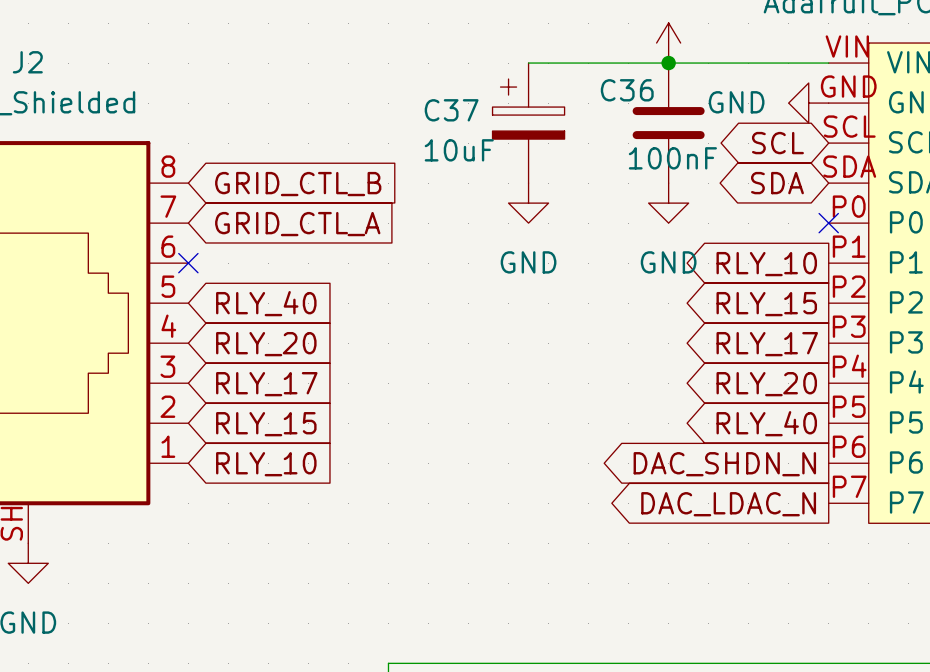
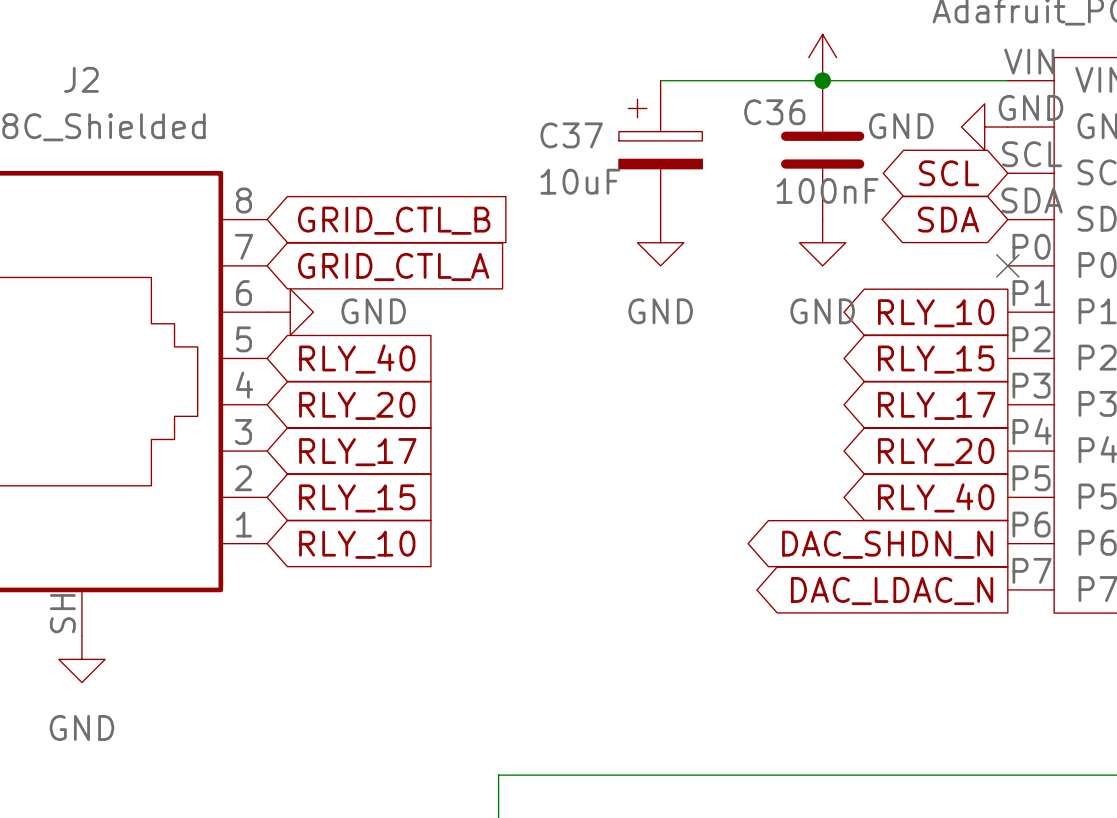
no-connect mark: (188, 263) -> none
power symbol: none -> GND (290, 312)

